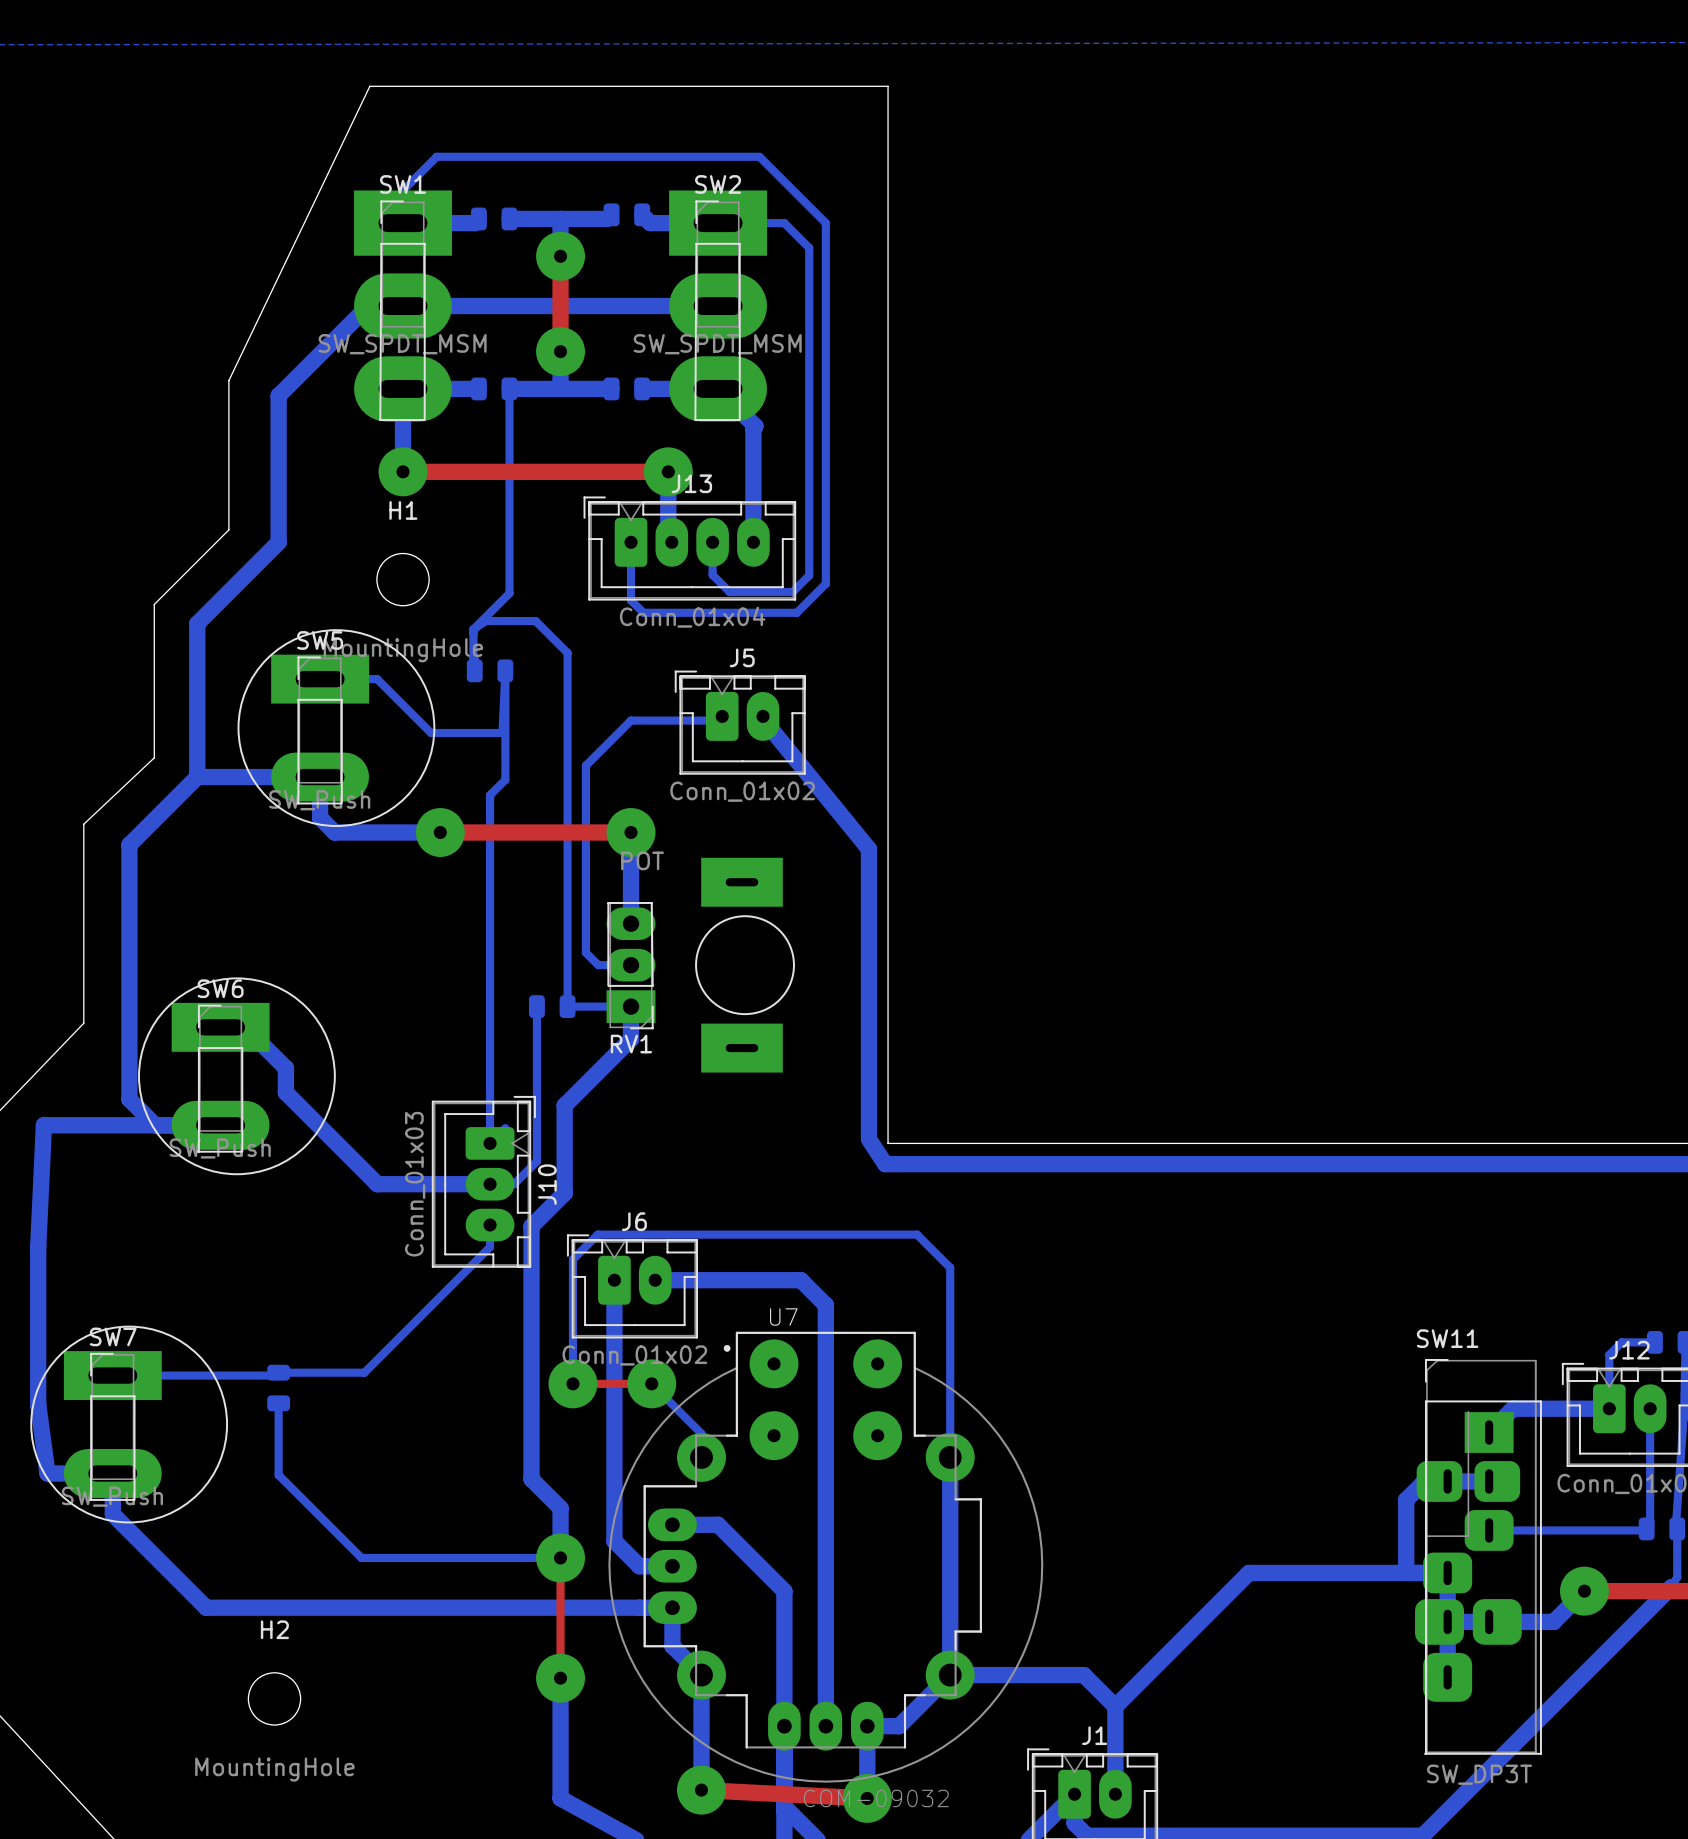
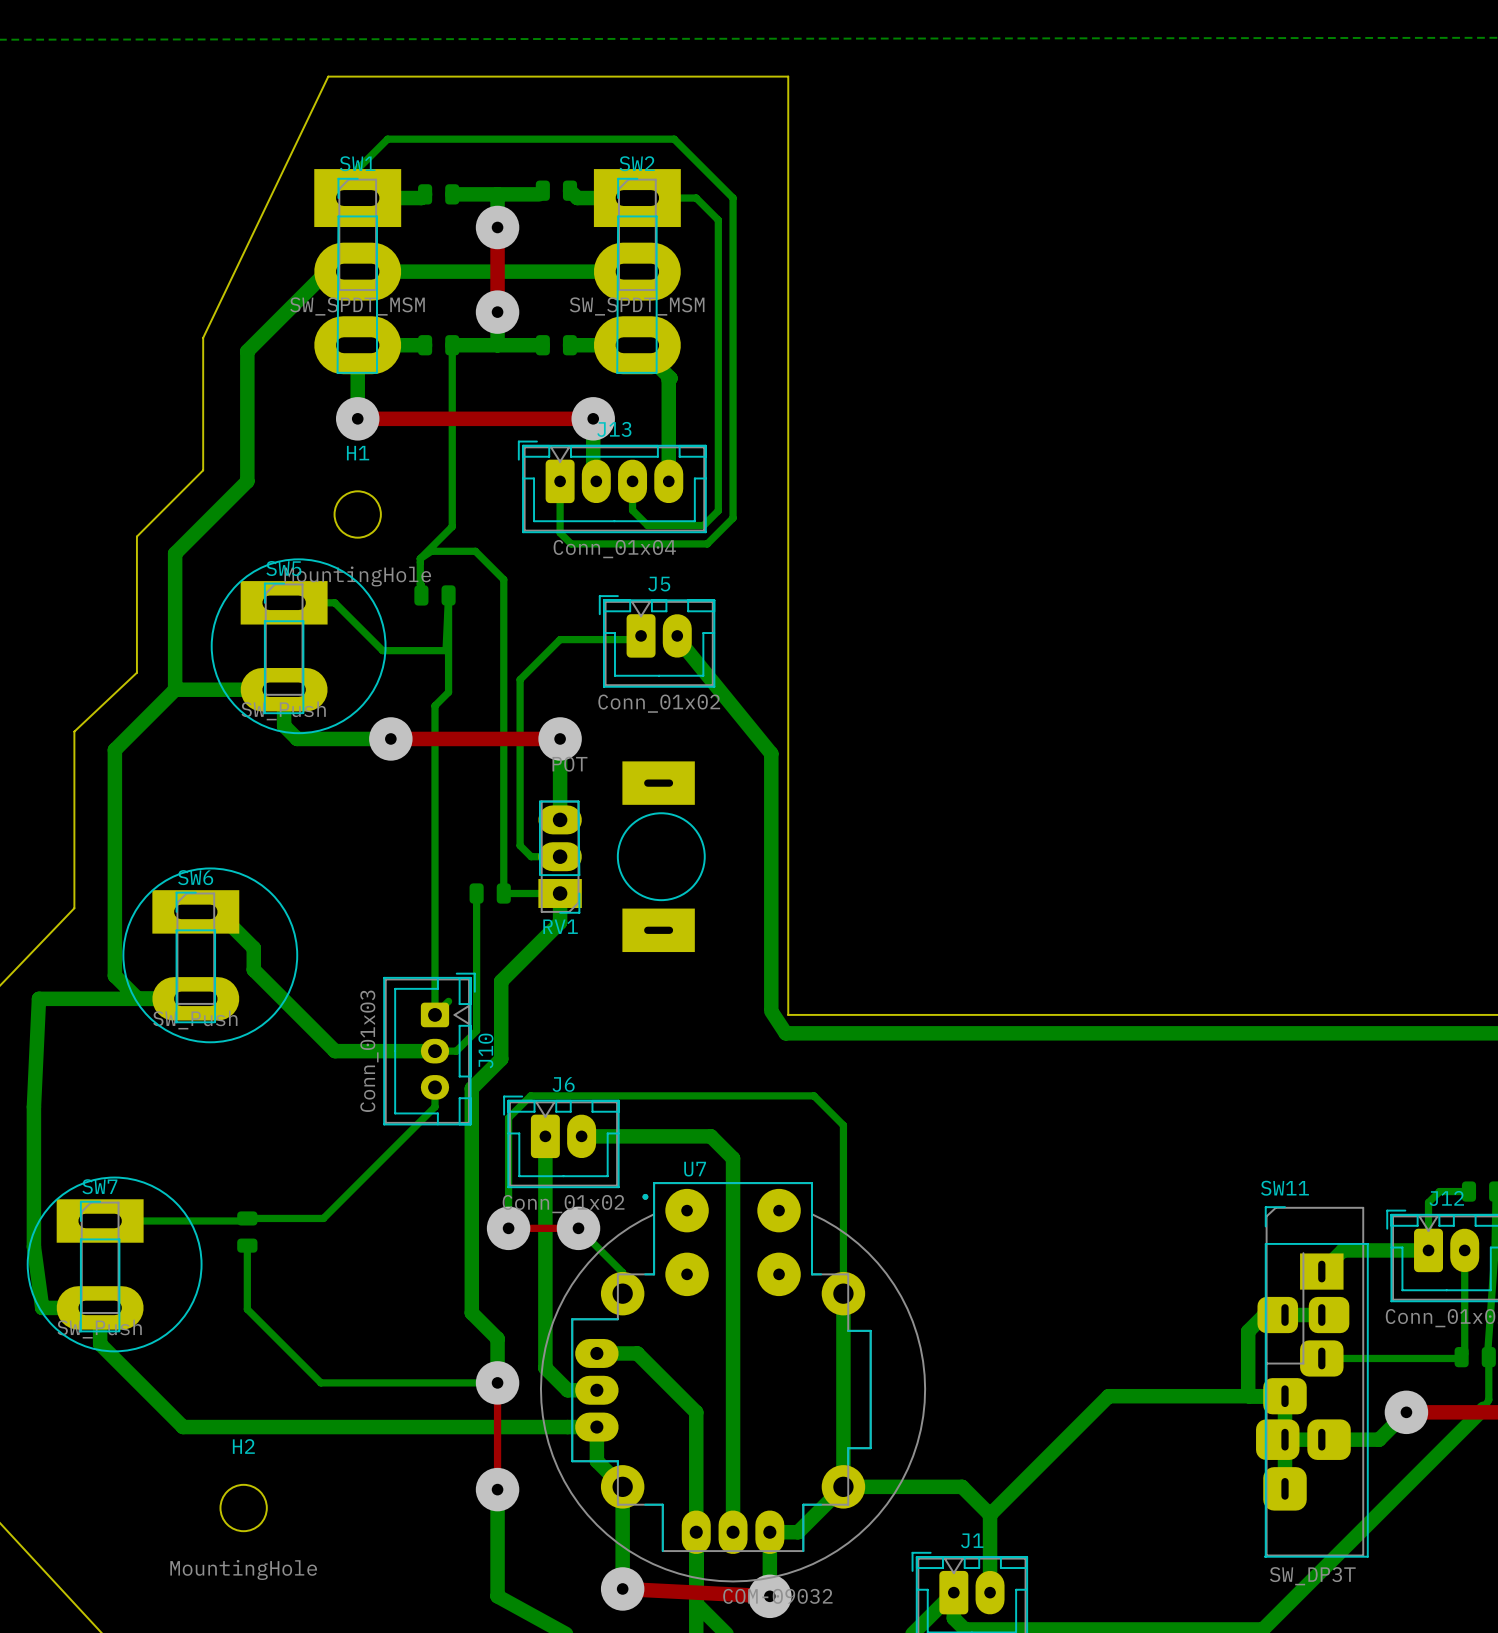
J10 footprint: [431, 1095, 536, 1268] -> [383, 972, 476, 1126]

